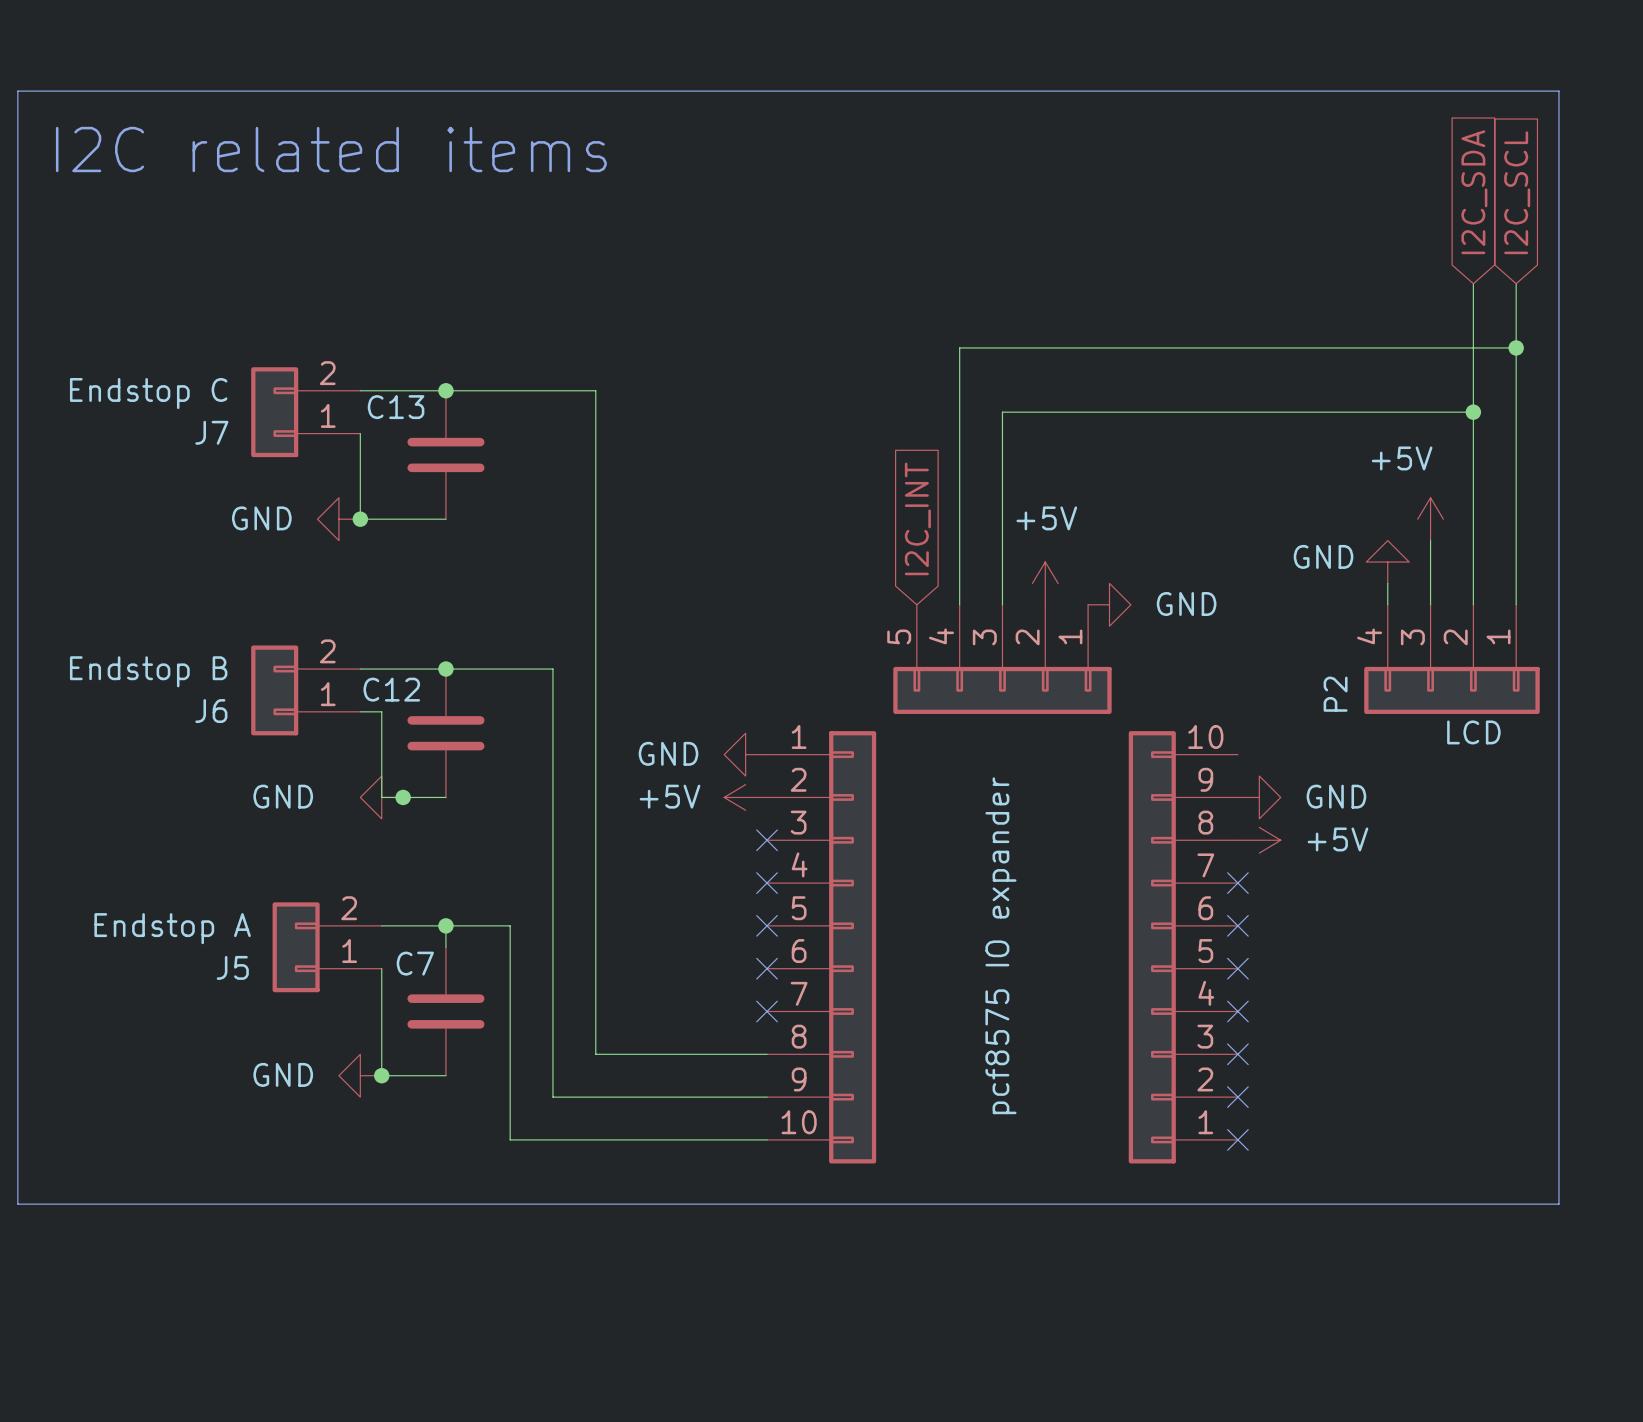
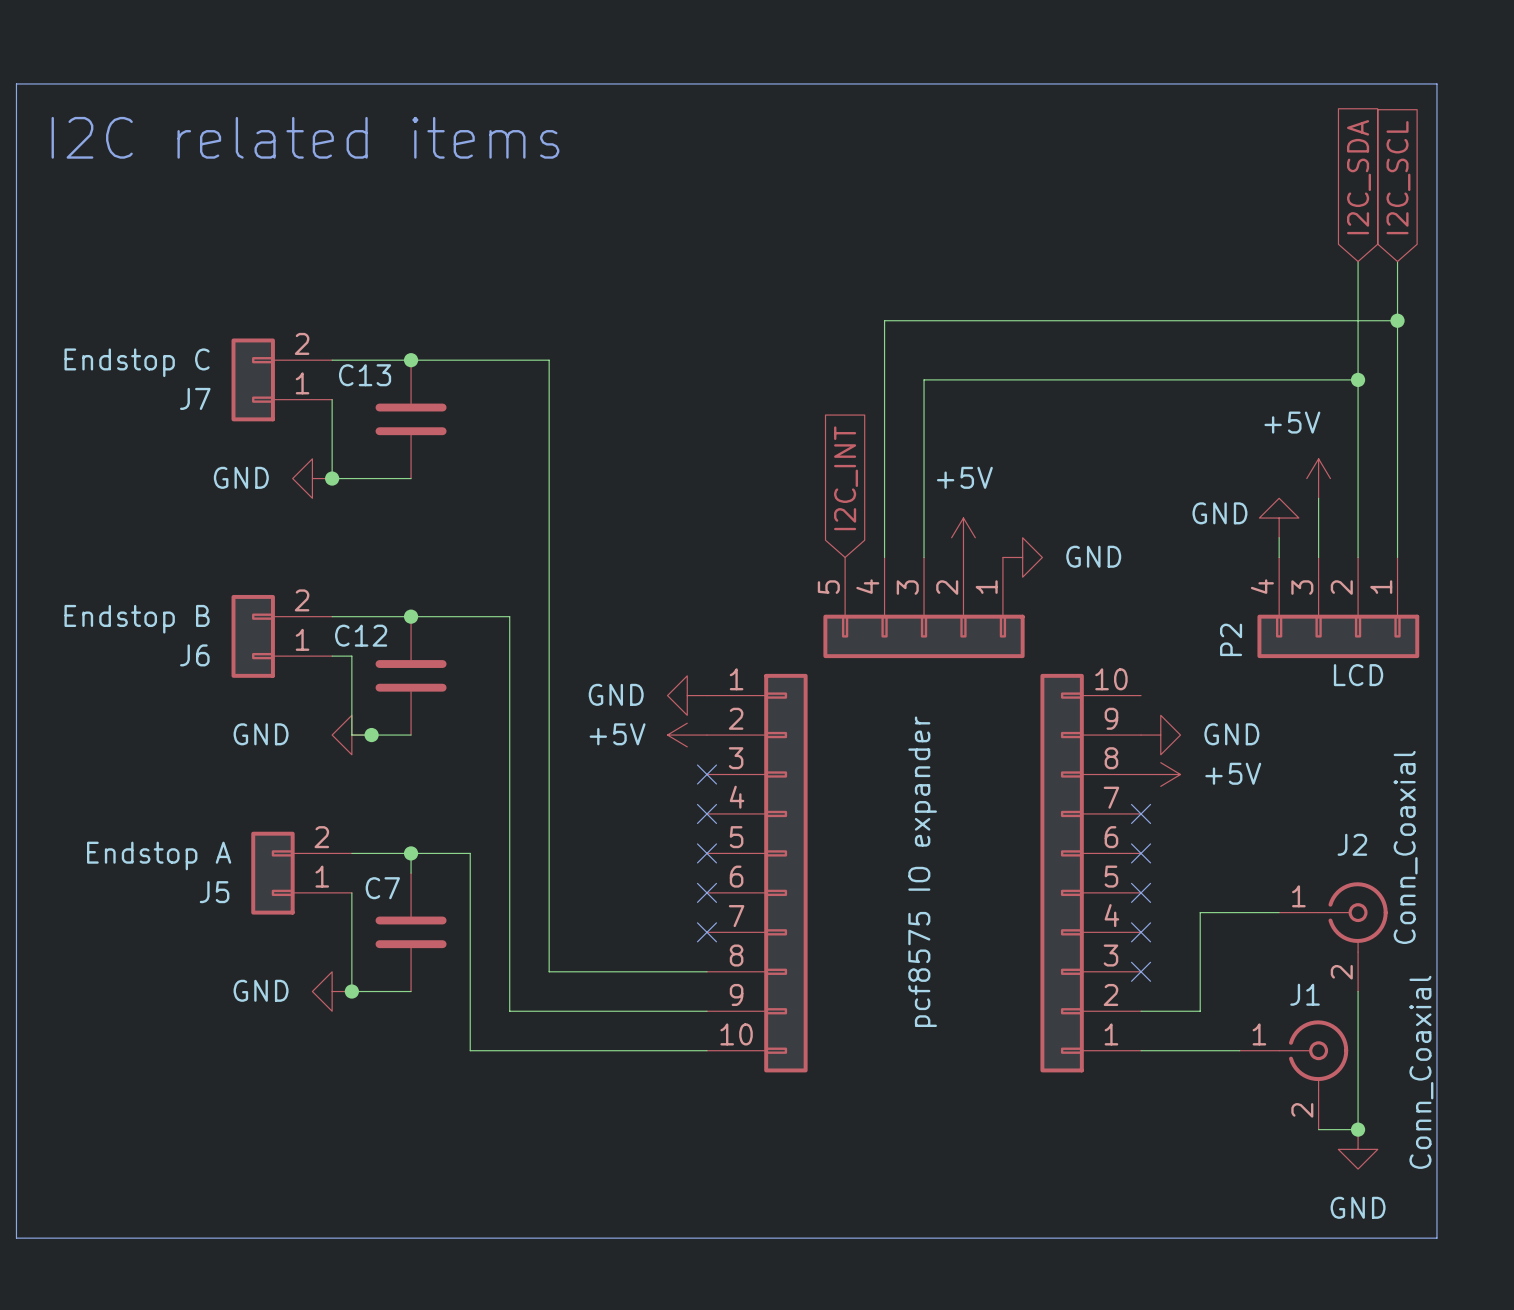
wire: none -> (1279, 912) (1200, 912) (1200, 1011) (1141, 1011)
J2: none -> Conn_Coaxial (1333, 936)
wire: none -> (1358, 991) (1358, 1129) (1318, 1129)
no-connect mark: (1237, 1097) -> none
wire: none -> (1141, 1050) (1239, 1050)
no-connect mark: (1237, 1139) -> none
J1: none -> Conn_Coaxial (1293, 1075)
line: (17, 1204) (1558, 1204) -> (16, 1109) (16, 1238) (1436, 1238) (1436, 1109)
junction: none -> (1358, 1129)
power symbol: none -> GND (1358, 1149)

